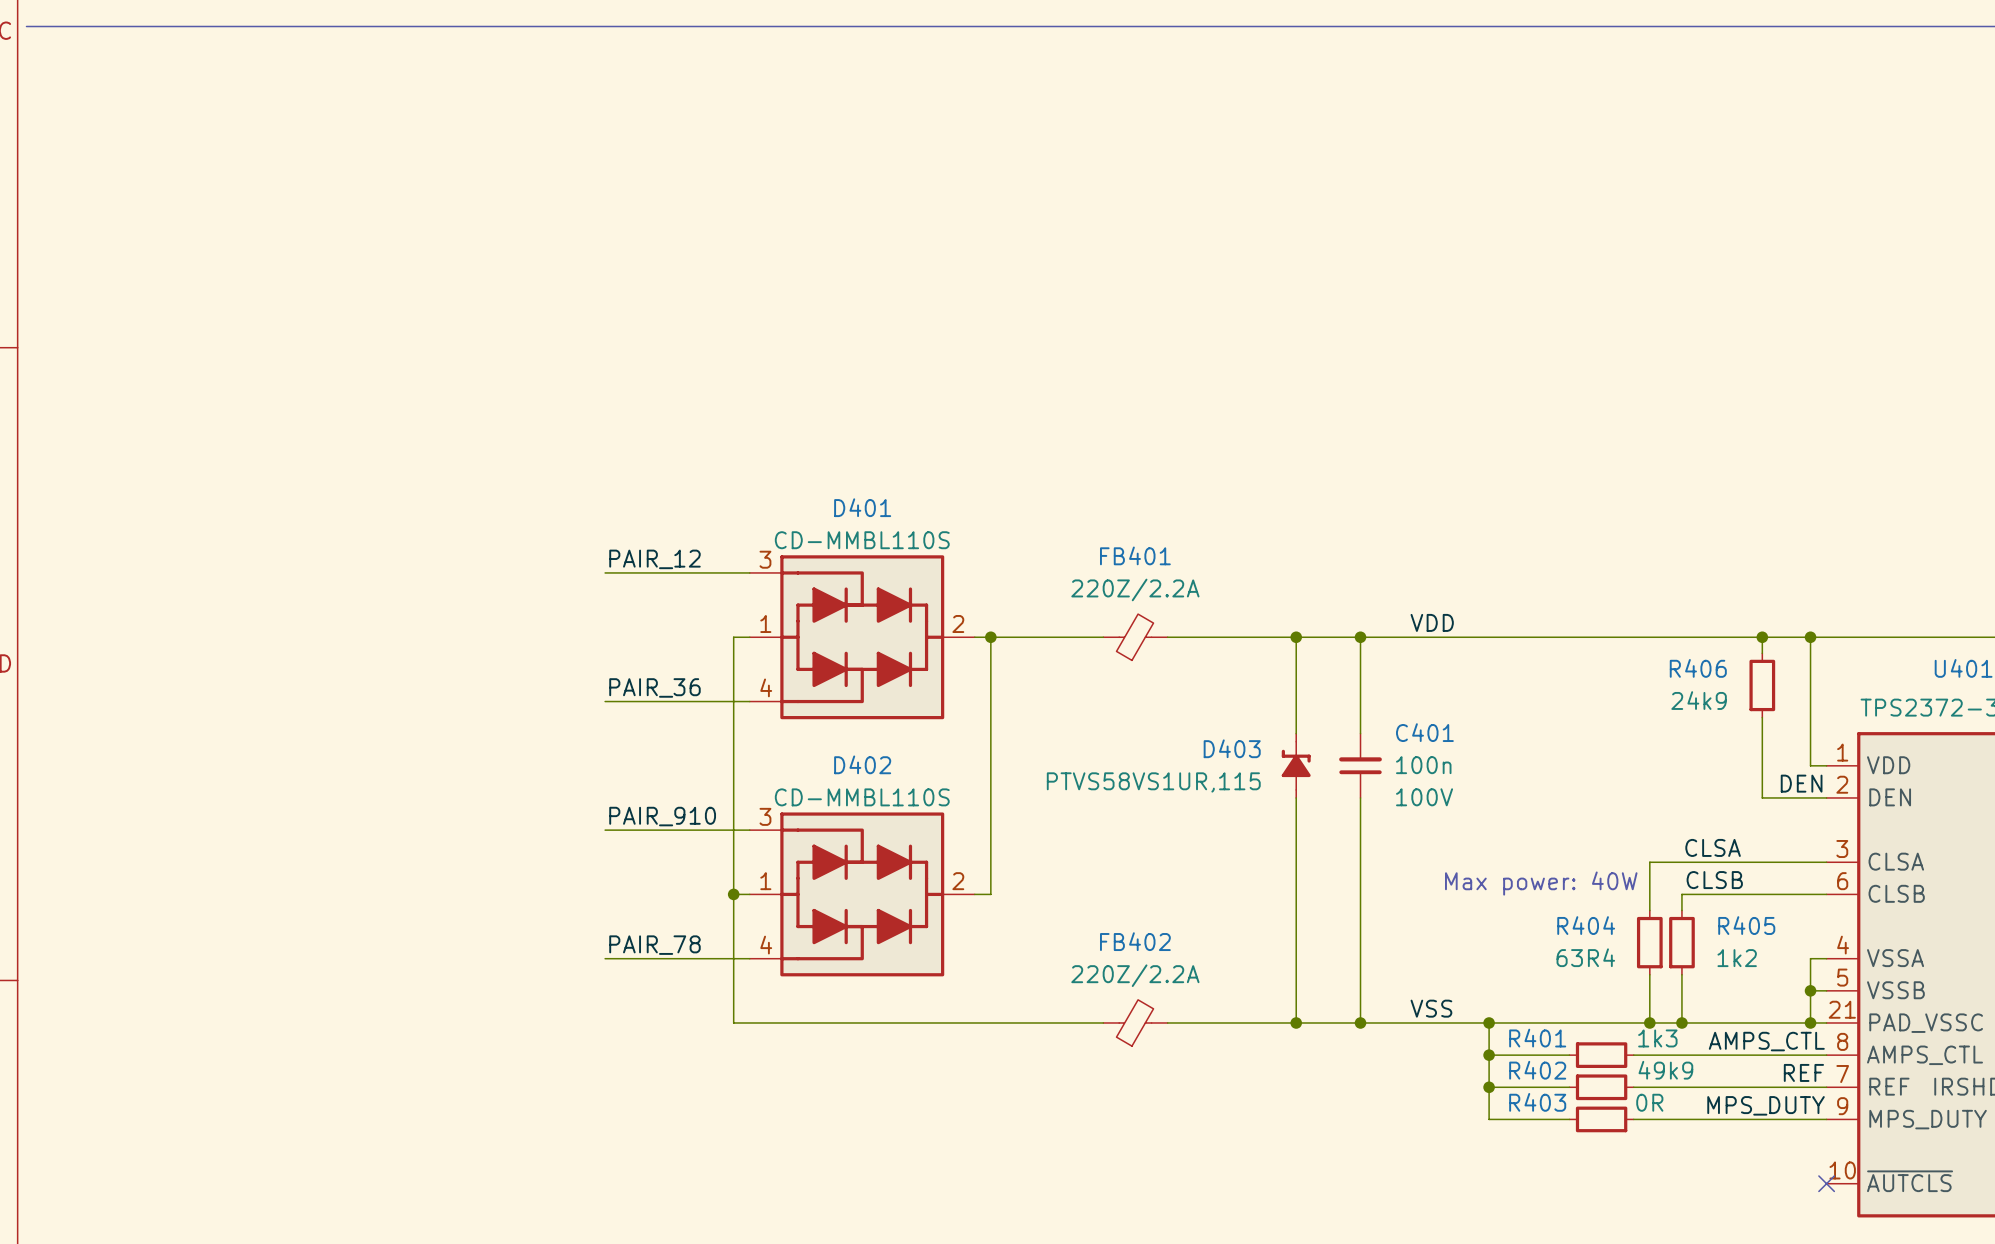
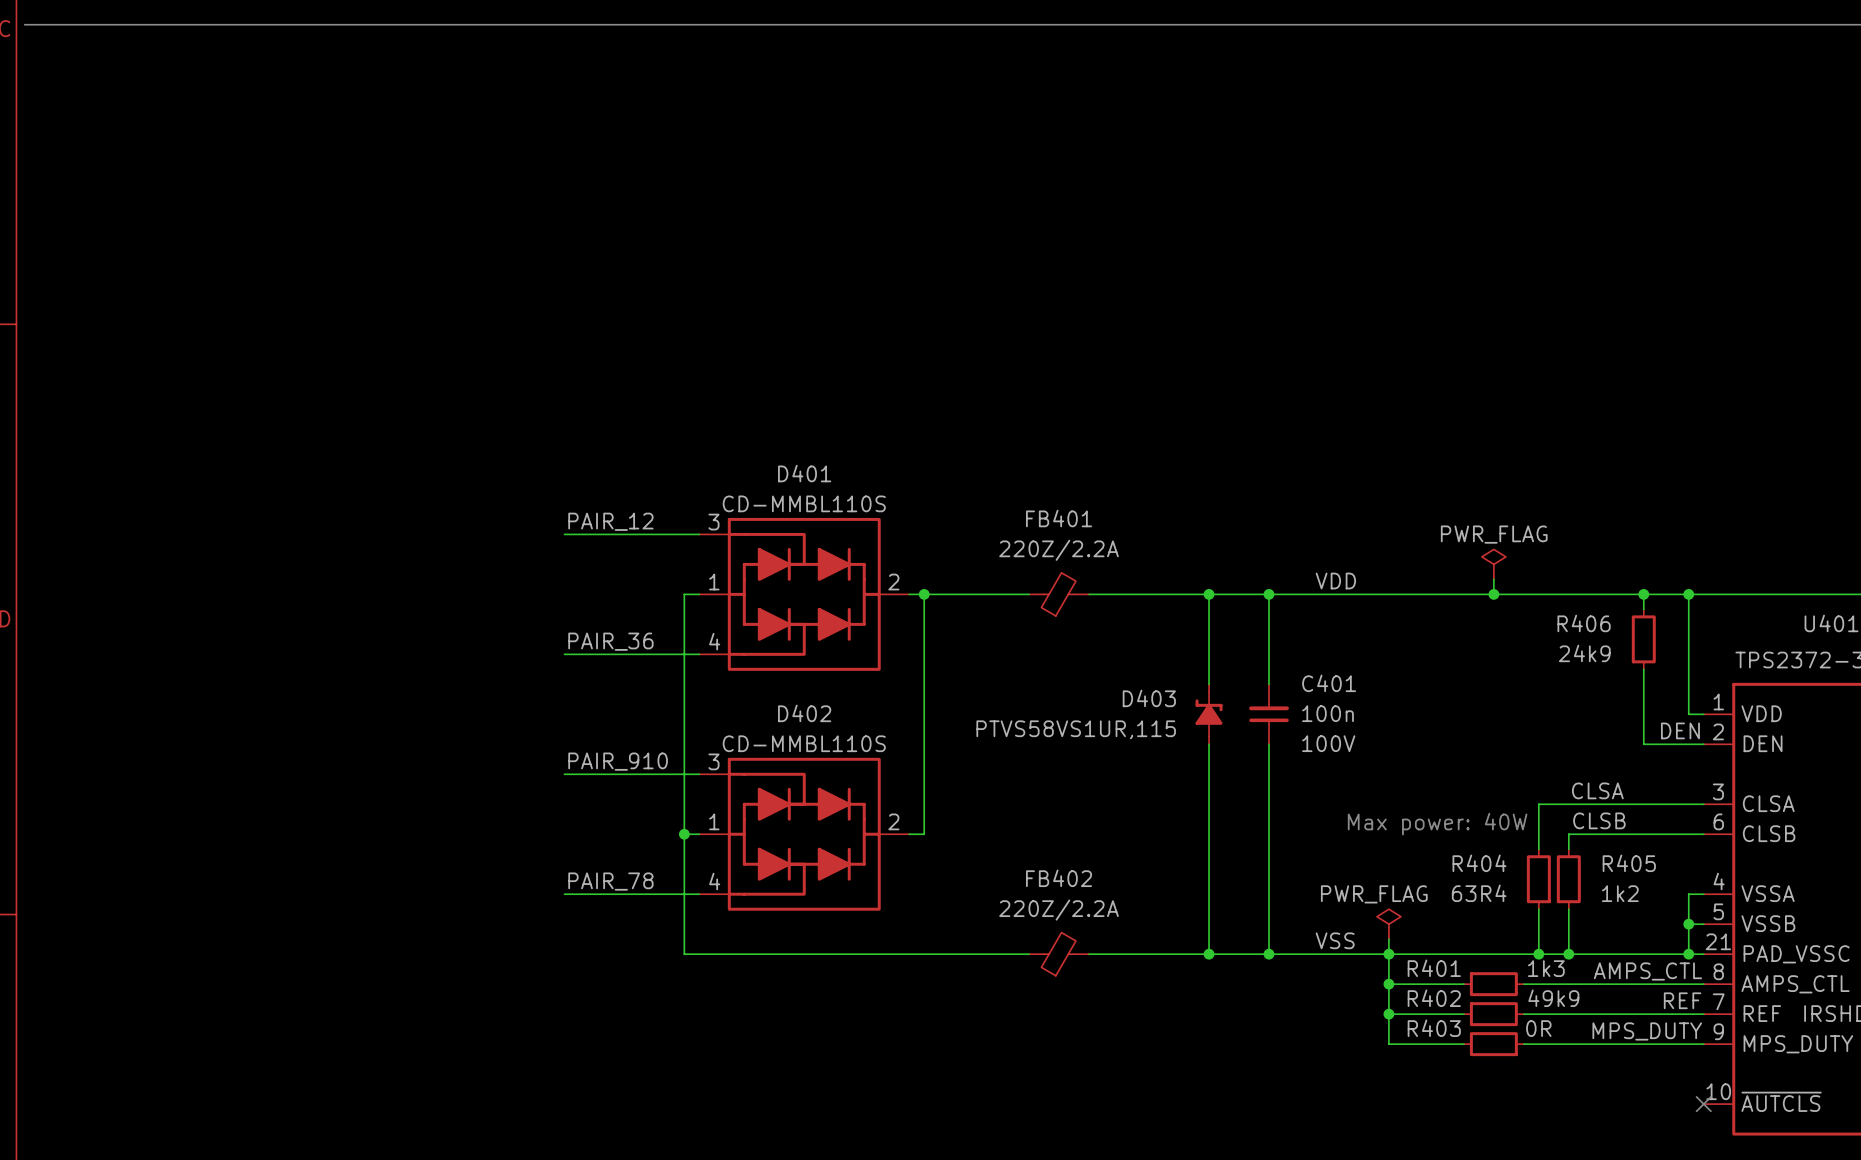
power symbol: none -> PWR_FLAG (1493, 564)
wire: none -> (1493, 579) (1493, 594)
junction: none -> (1493, 594)
power symbol: none -> PWR_FLAG (1388, 924)
wire: none -> (1388, 939) (1388, 954)

